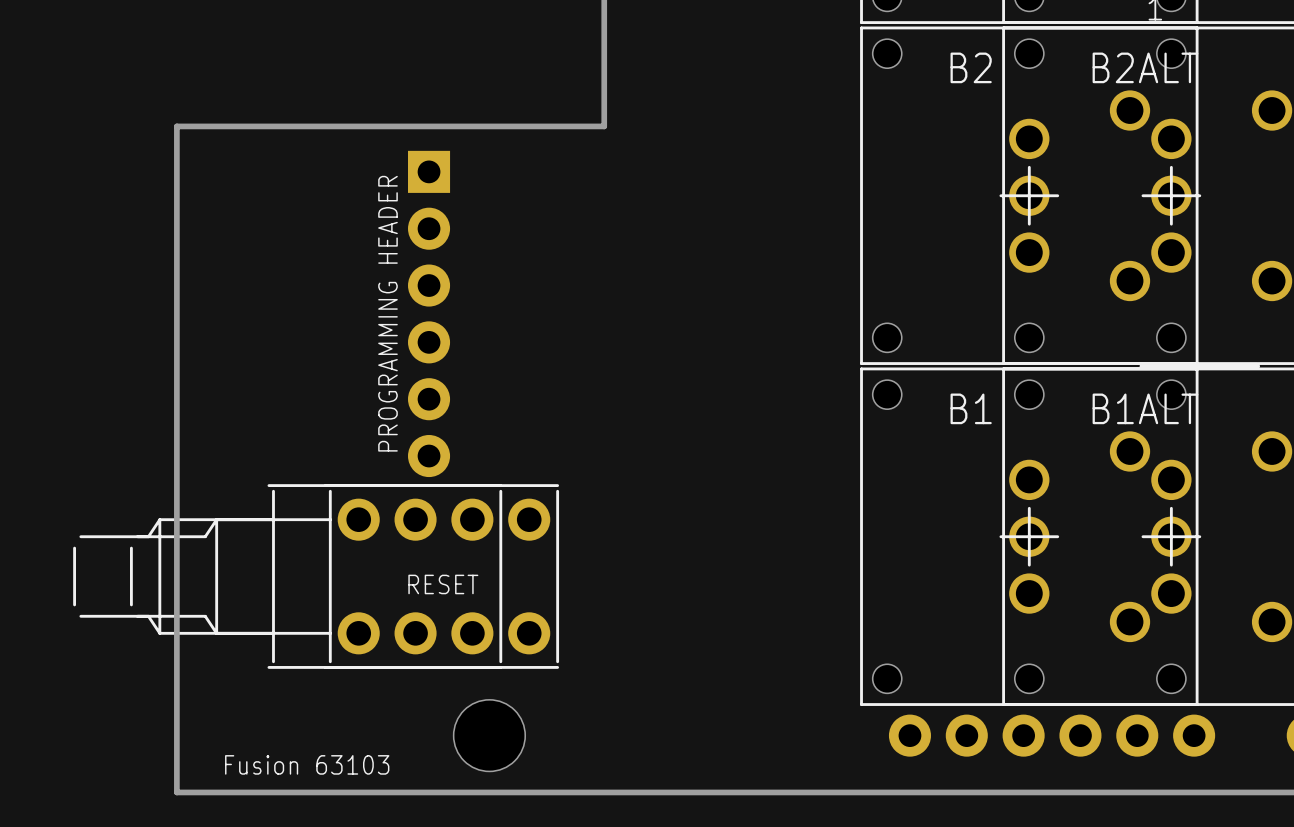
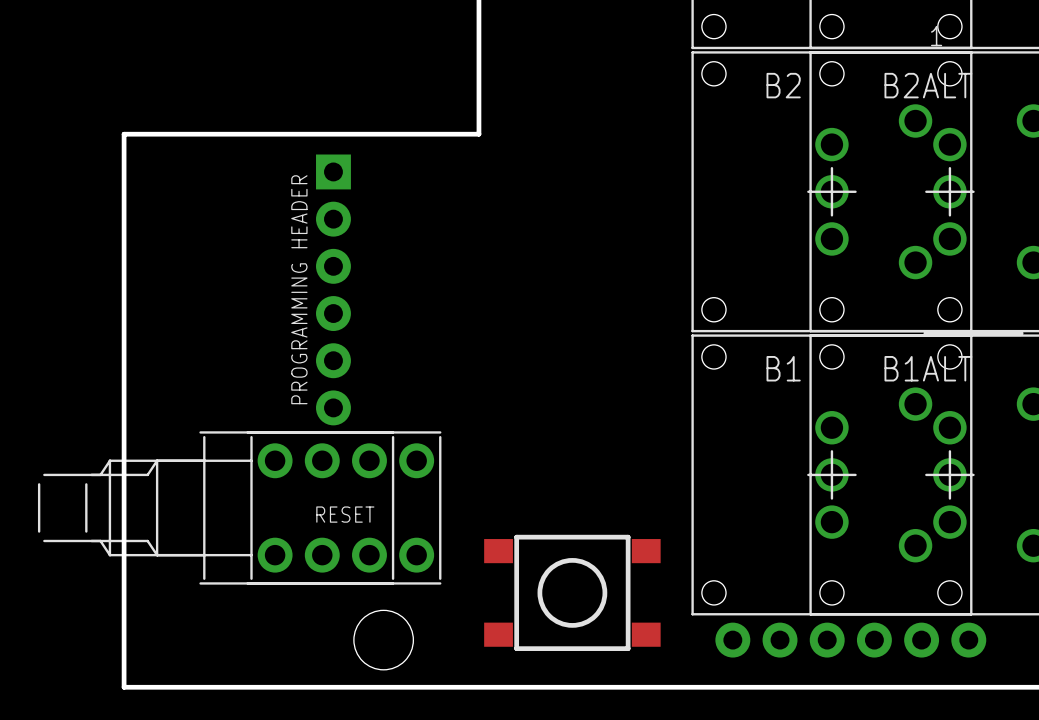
part: none -> (572, 592)
text: Fusion 63103 (307, 764) -> none

